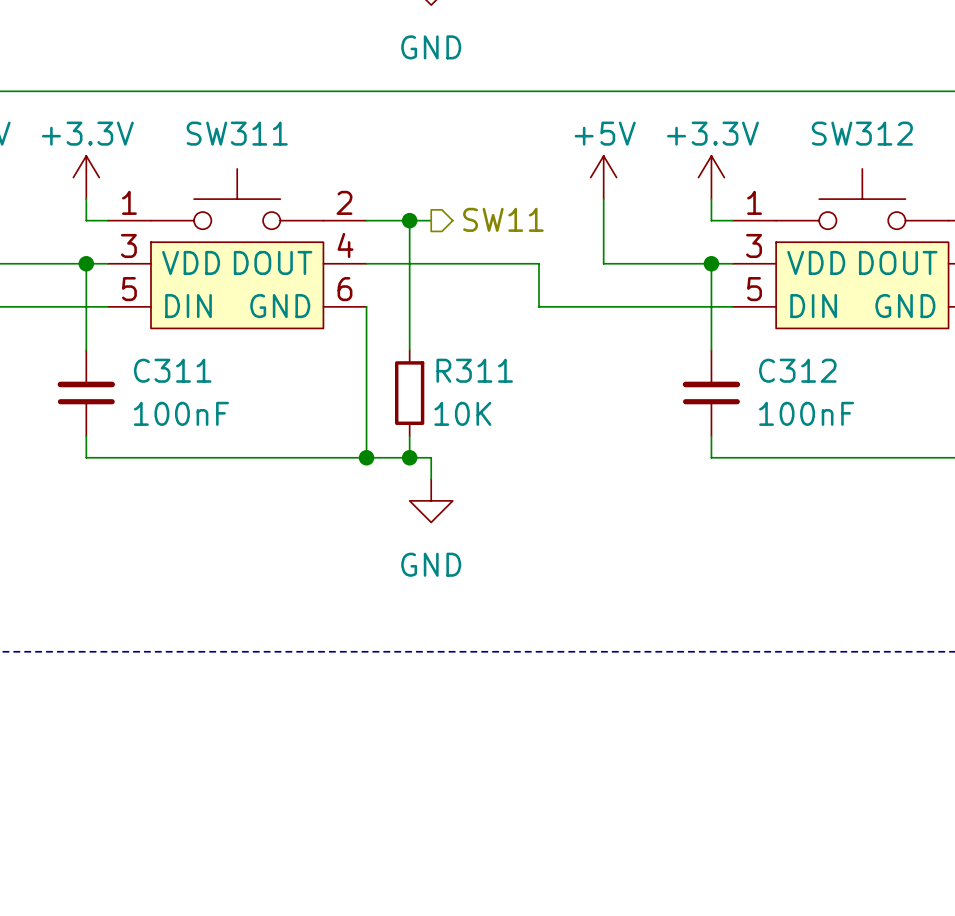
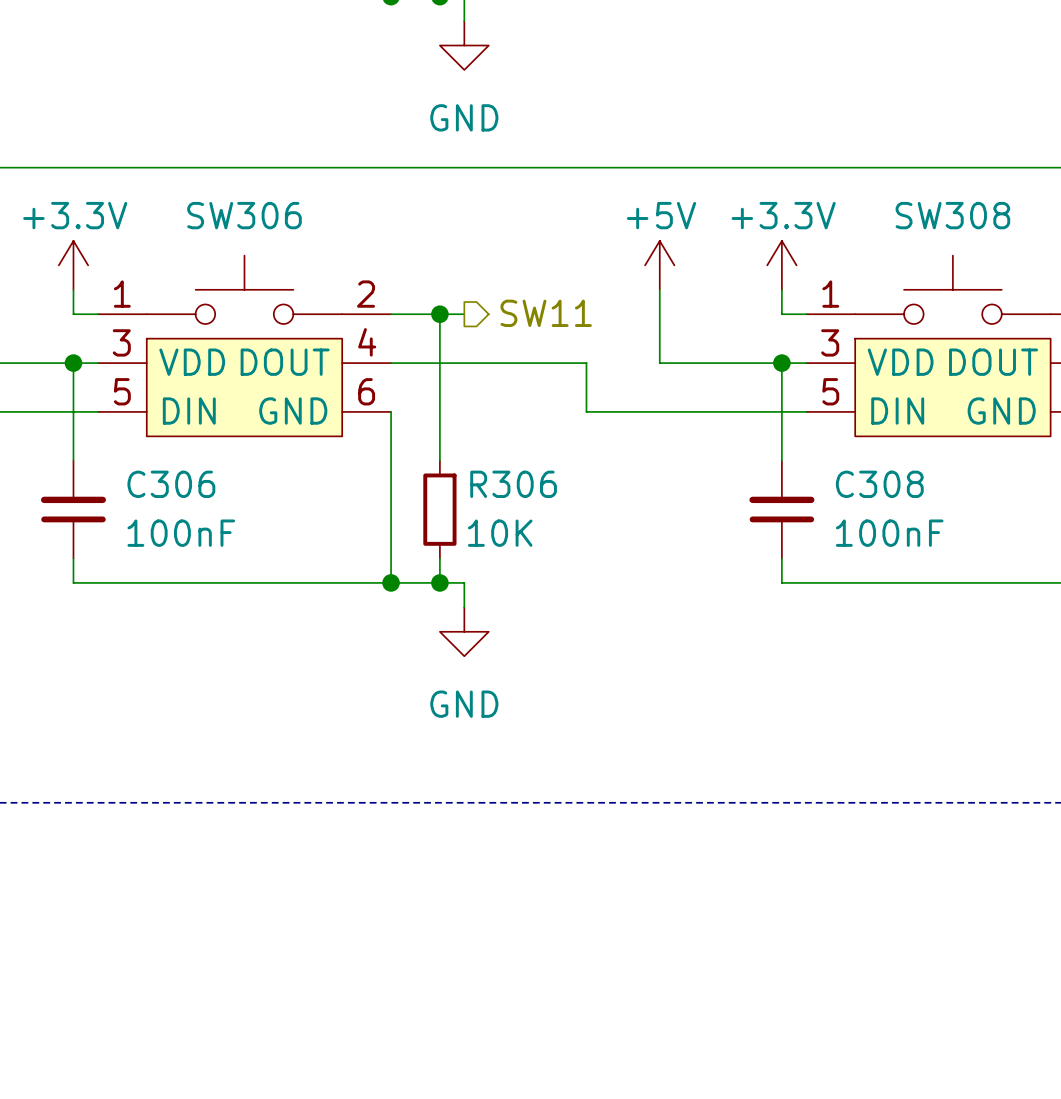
SW311 name: SW311 (237, 133) -> SW306 (244, 215)
SW312 name: SW312 (862, 133) -> SW308 (952, 215)
C311 name: C311 (172, 370) -> C306 (171, 484)
R311 name: R311 (474, 370) -> R306 (513, 484)
C312 name: C312 (797, 370) -> C308 (879, 484)

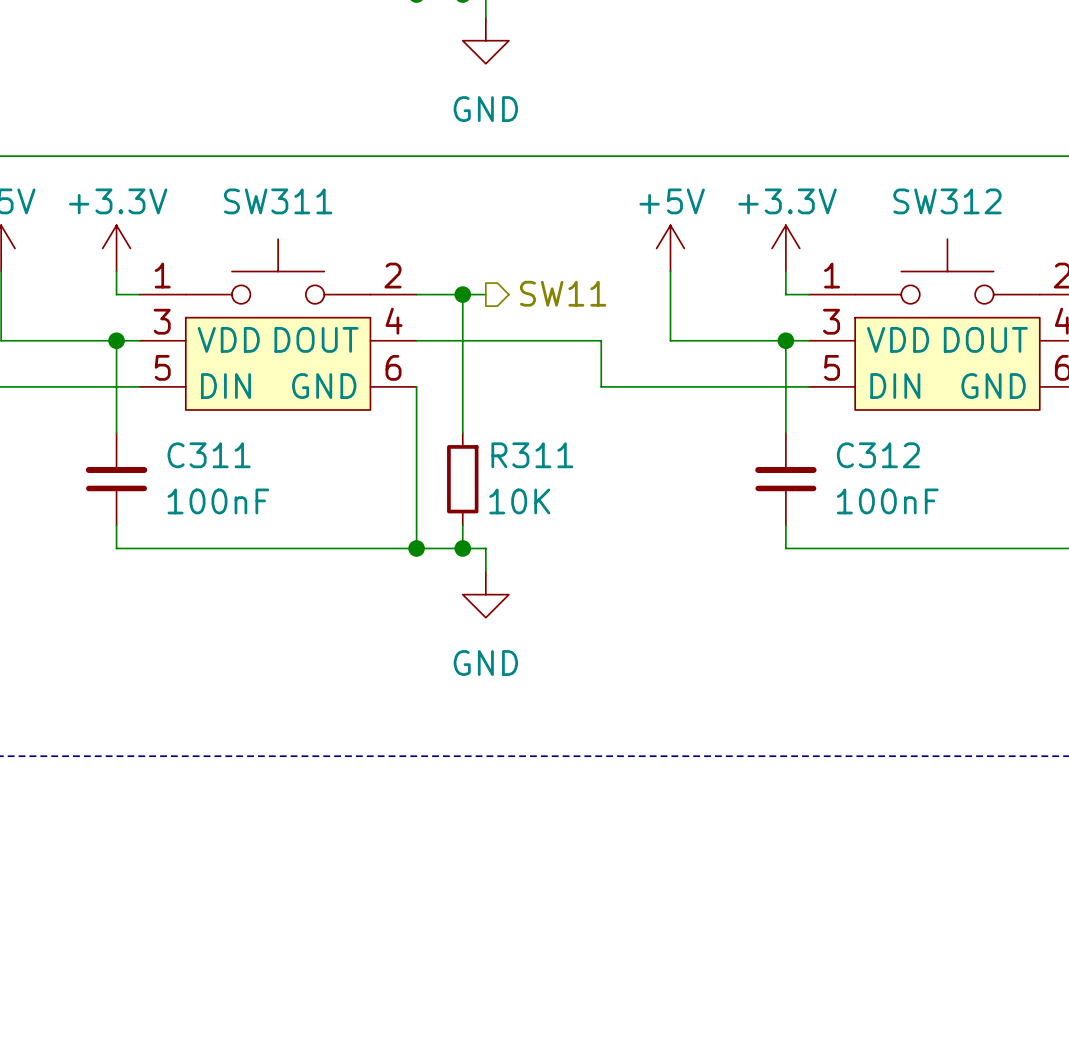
SW306 name: SW306 (244, 215) -> SW311 (278, 201)
SW308 name: SW308 (952, 215) -> SW312 (947, 201)
C306 name: C306 (171, 484) -> C311 (209, 455)
R306 name: R306 (513, 484) -> R311 (532, 455)
C308 name: C308 (879, 484) -> C312 (878, 455)

